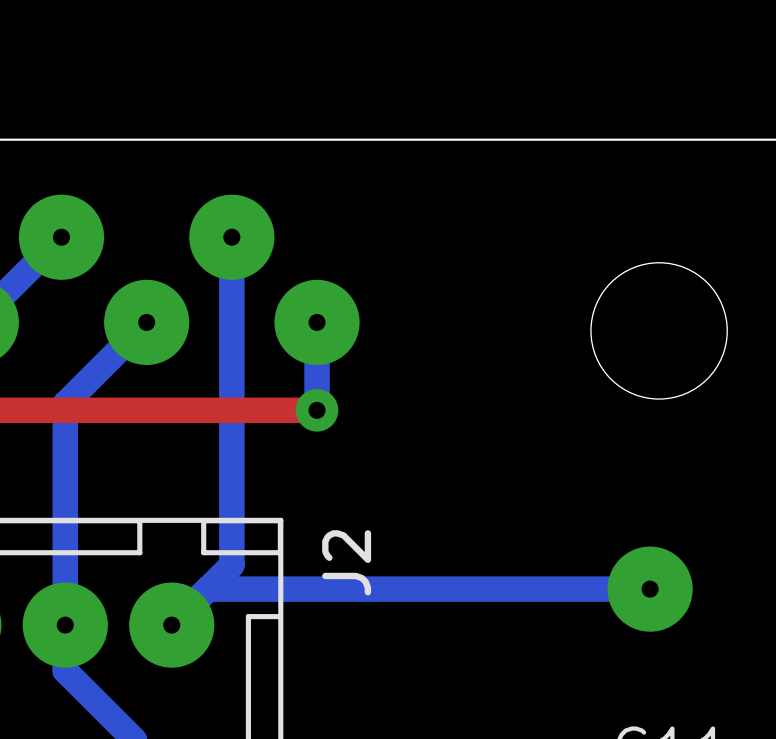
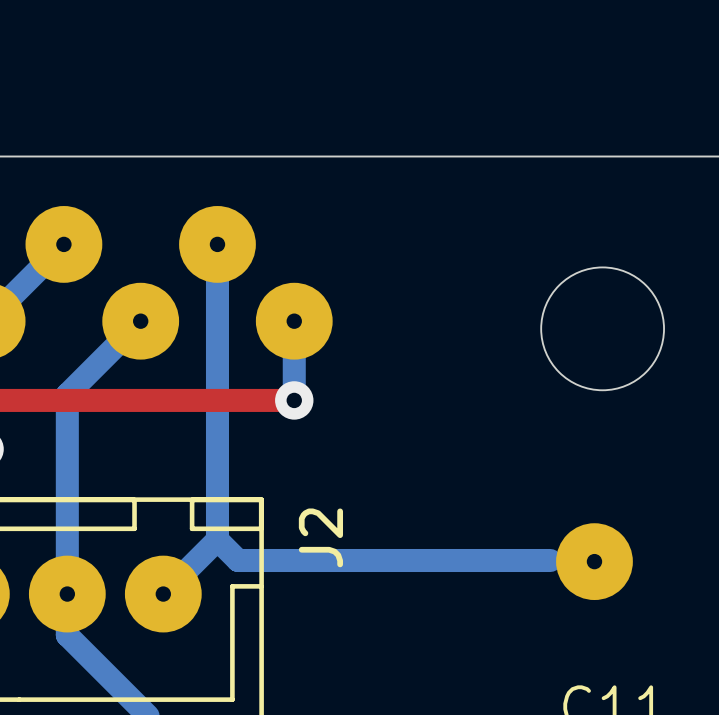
bottom track: none -> (217, 539) (238, 560) (550, 560)
bottom track: (207, 589) (650, 589) -> none

